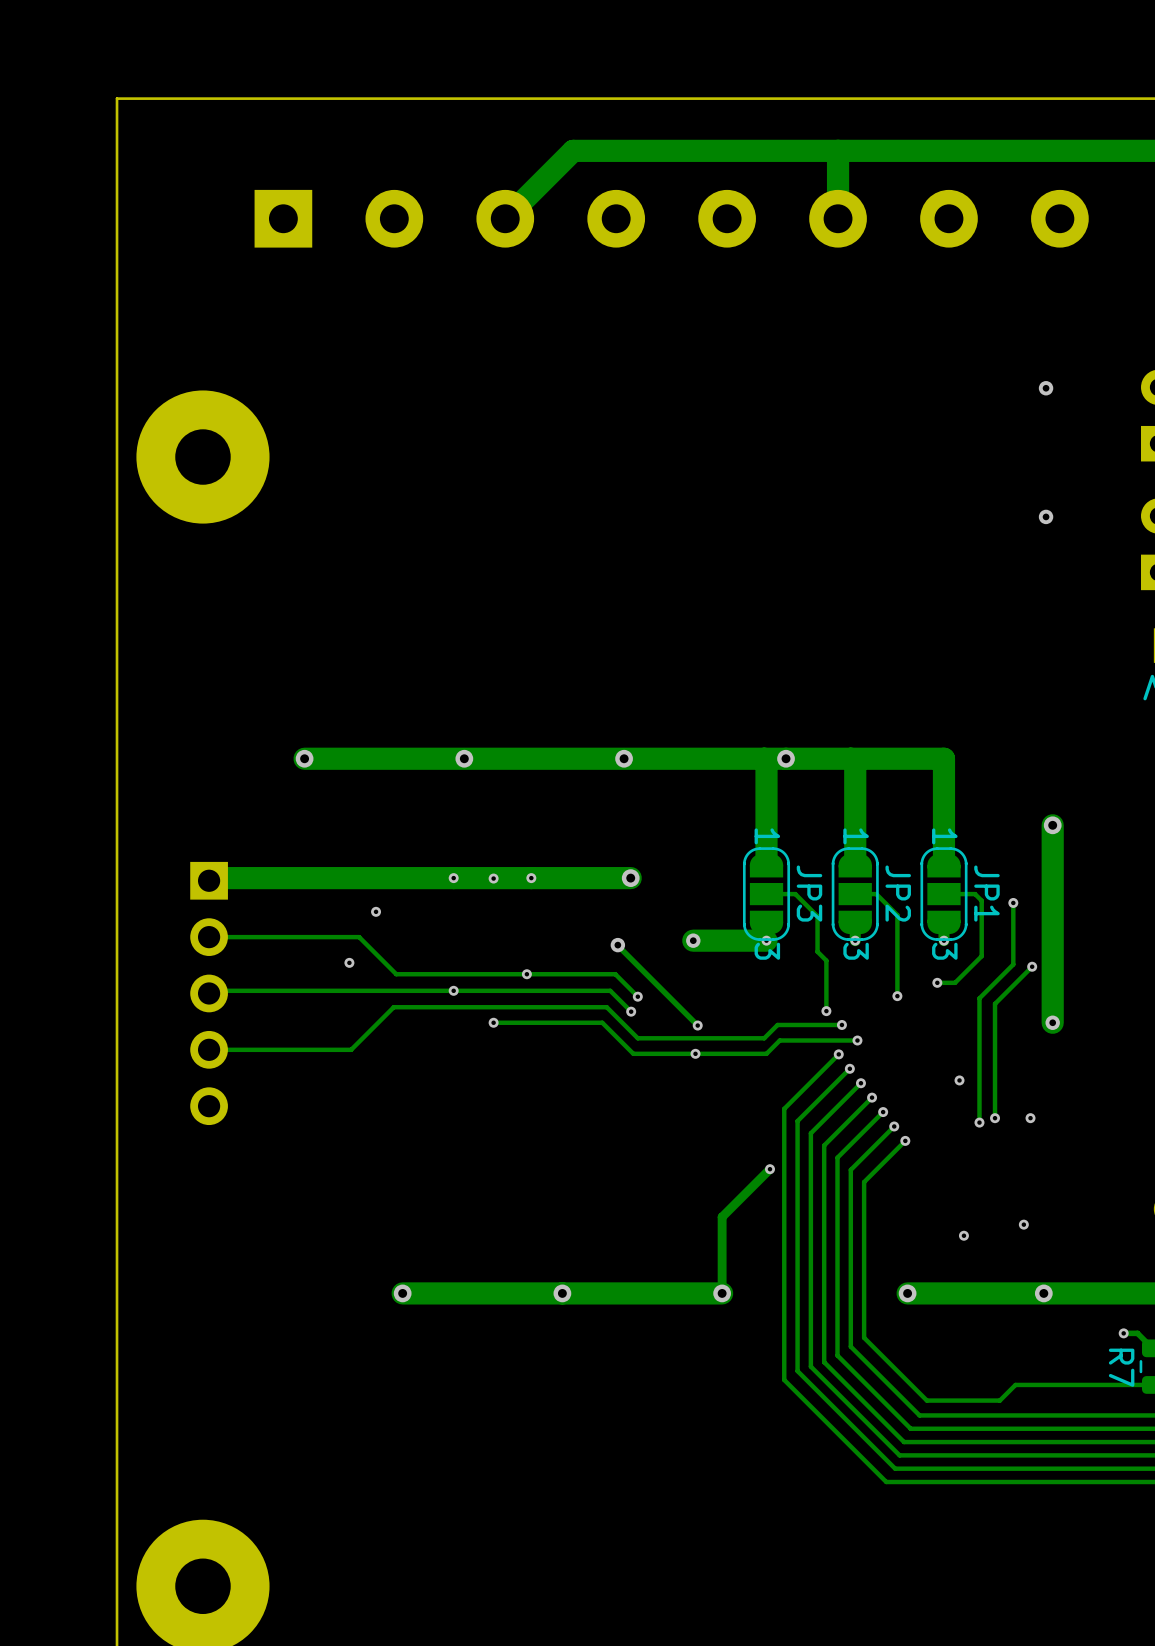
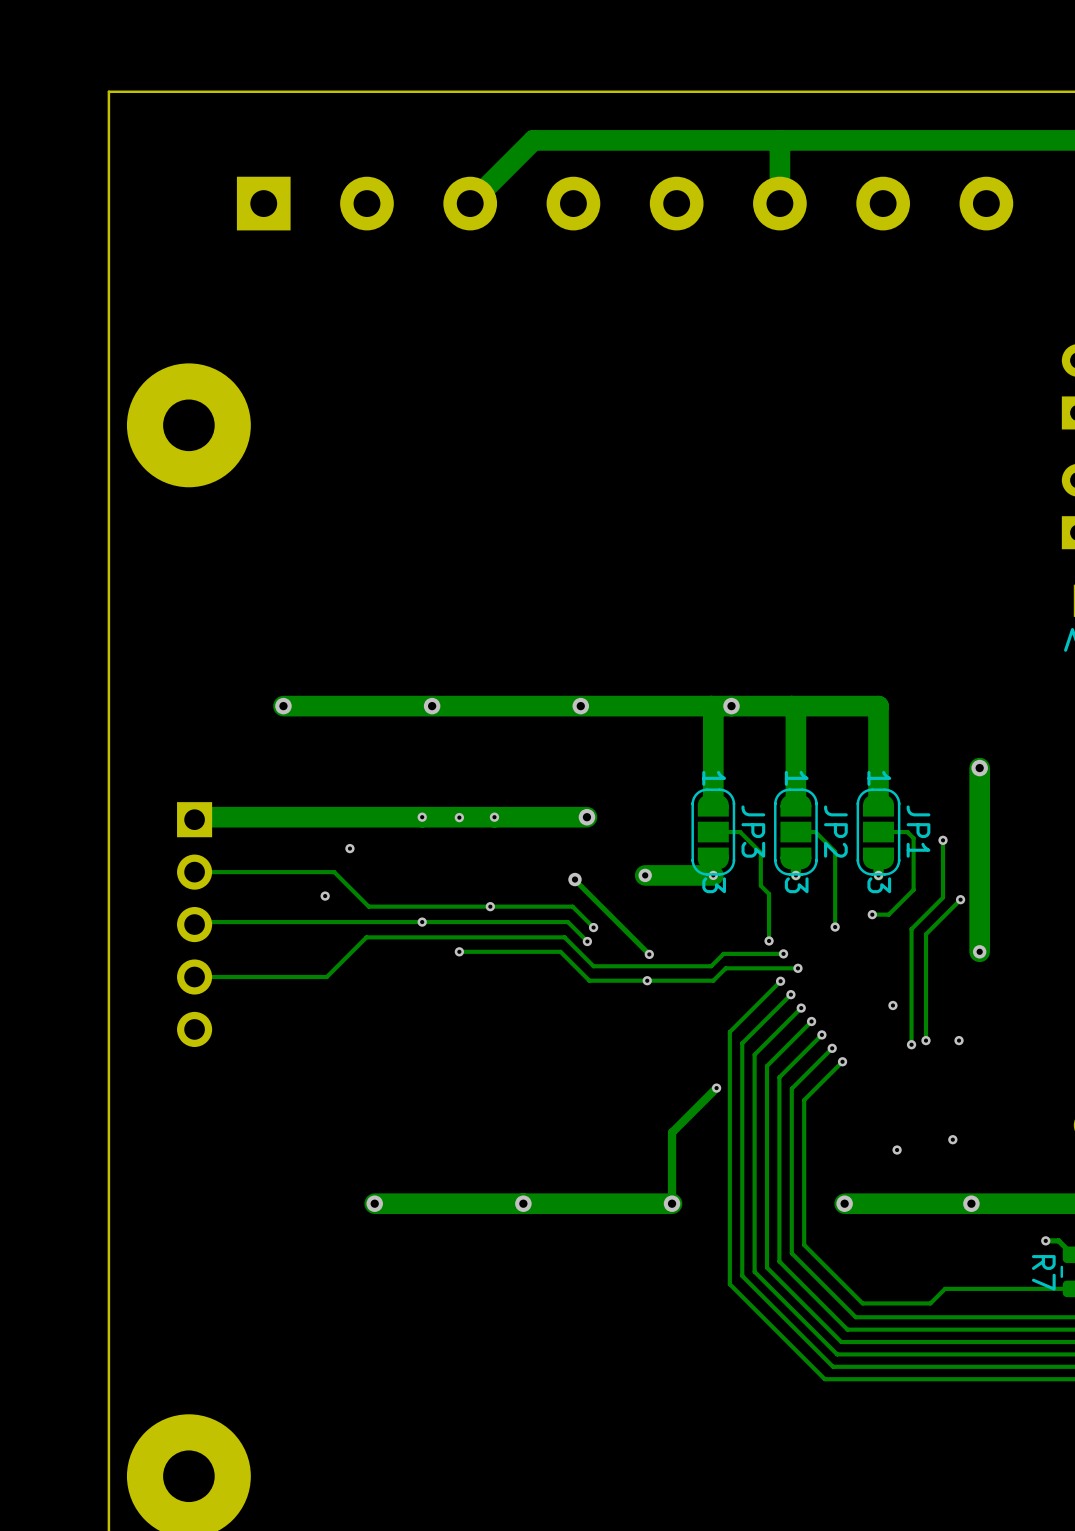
via: (1046, 388) -> none
via: (1046, 516) -> none

